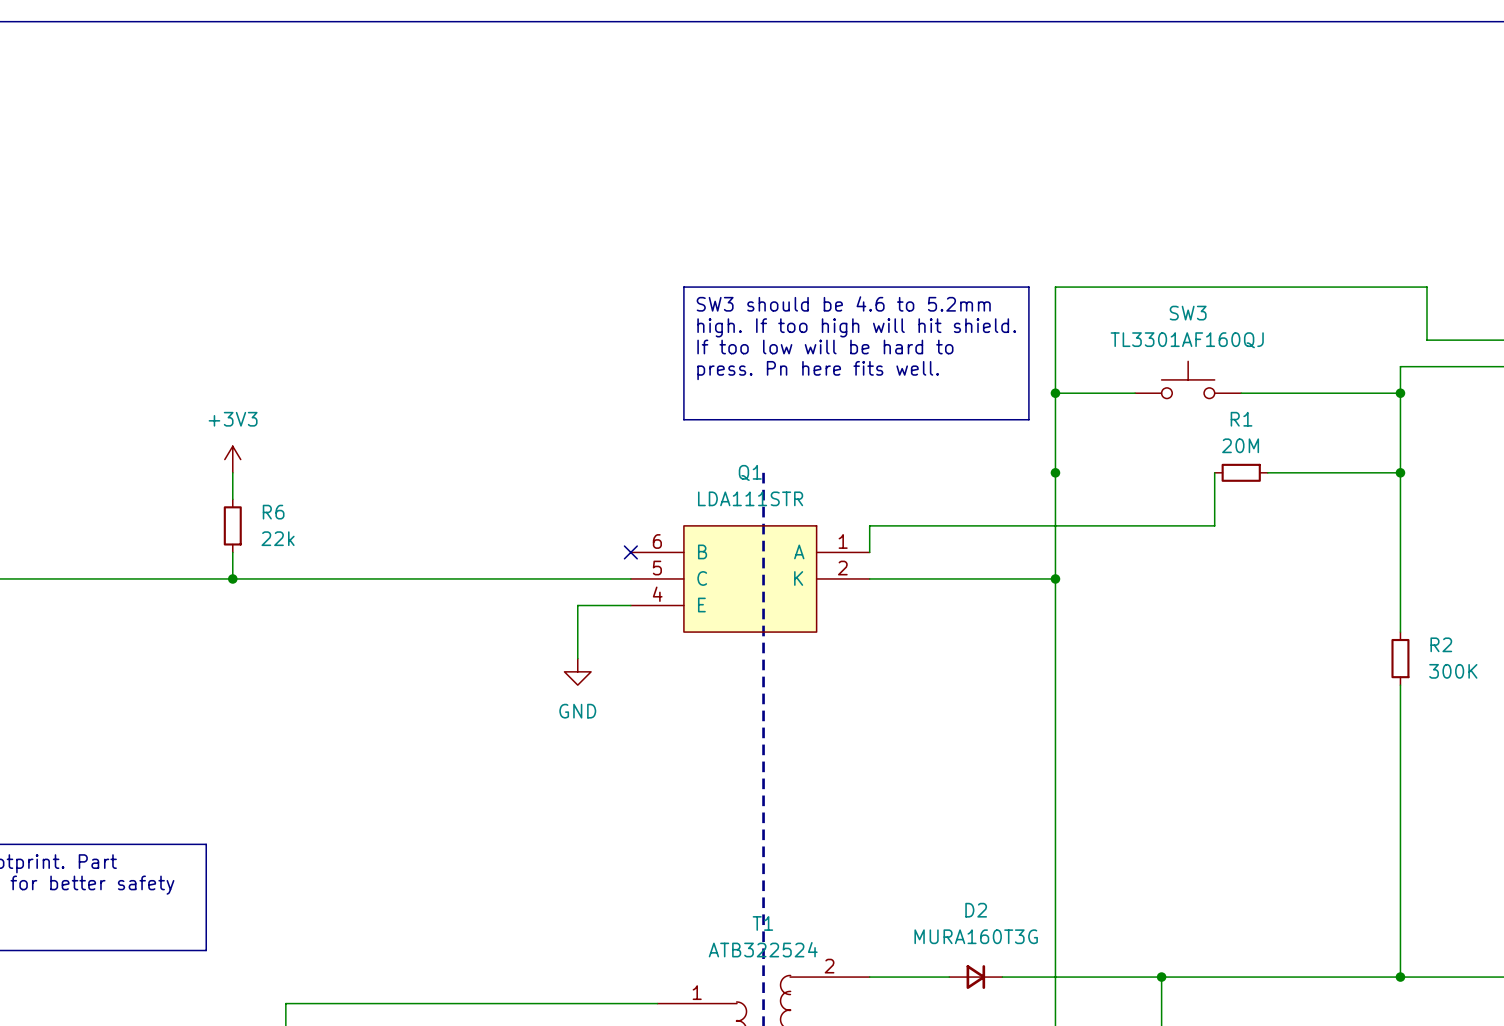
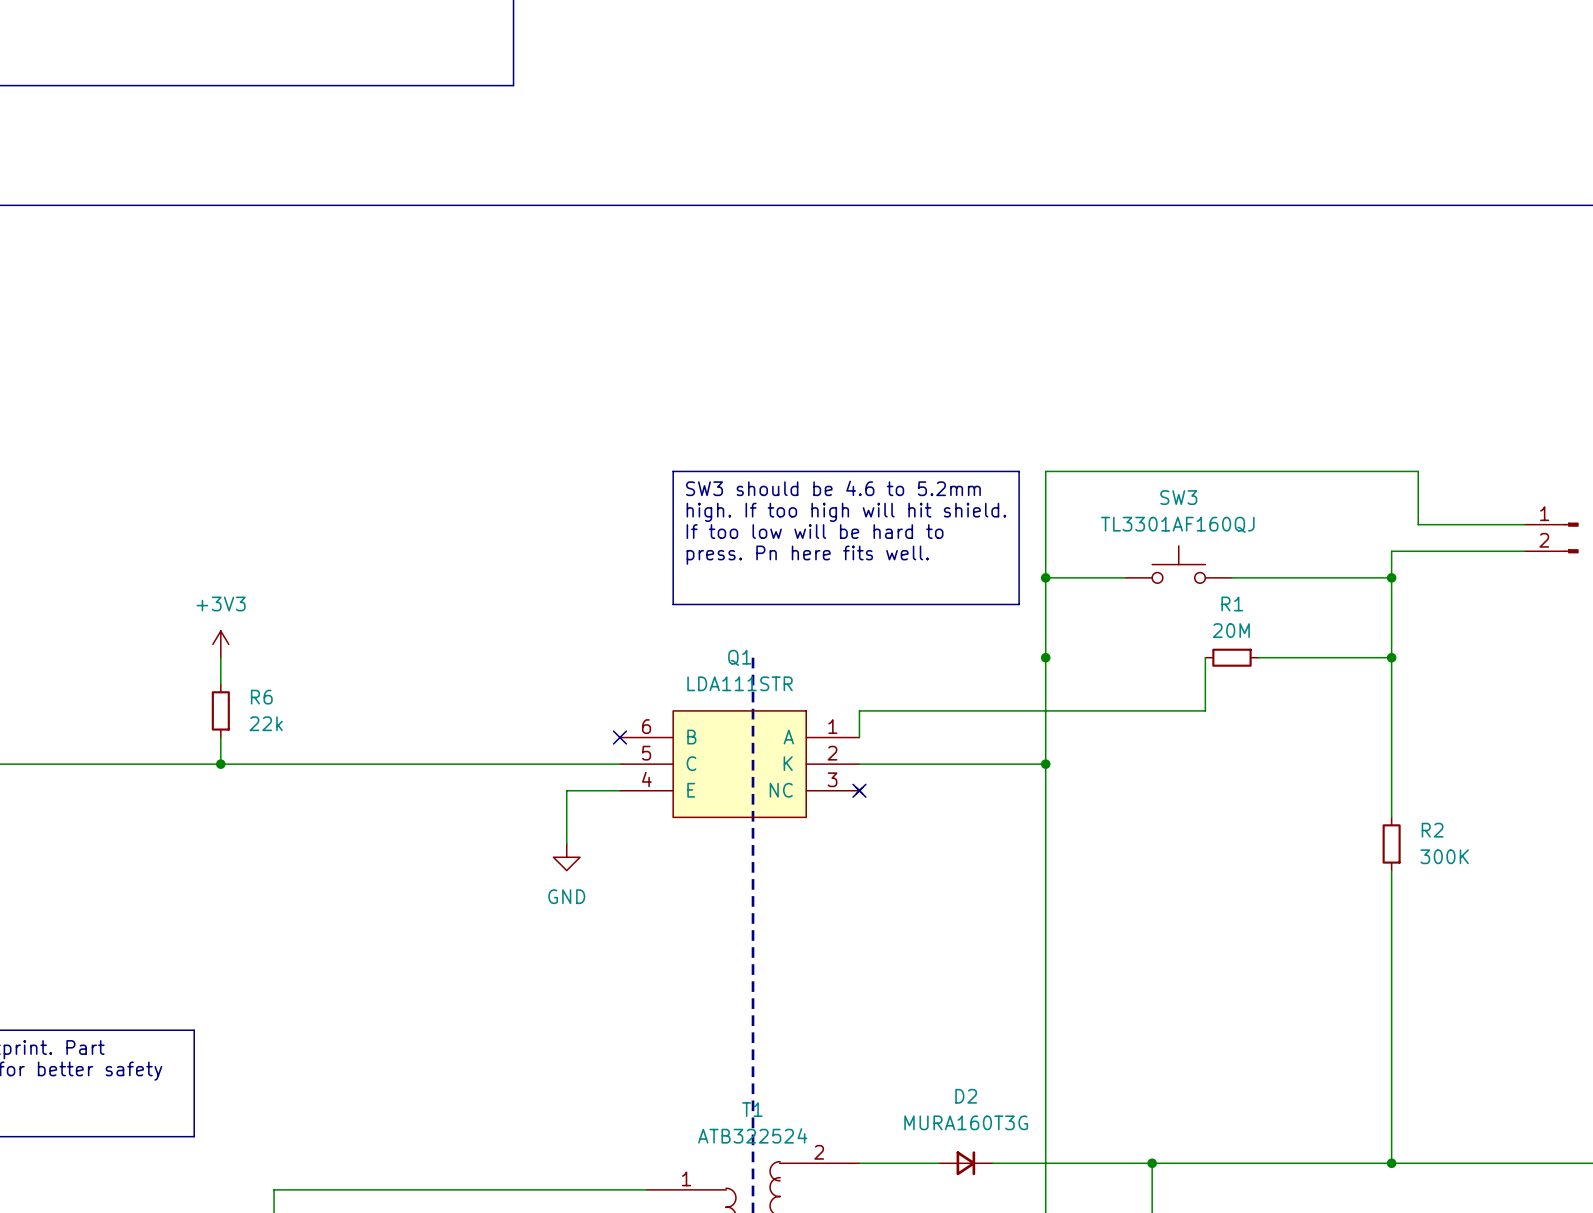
Q1 symbol: [630, 525, 870, 633] -> [619, 710, 863, 818]
no-connect mark: none -> (859, 790)

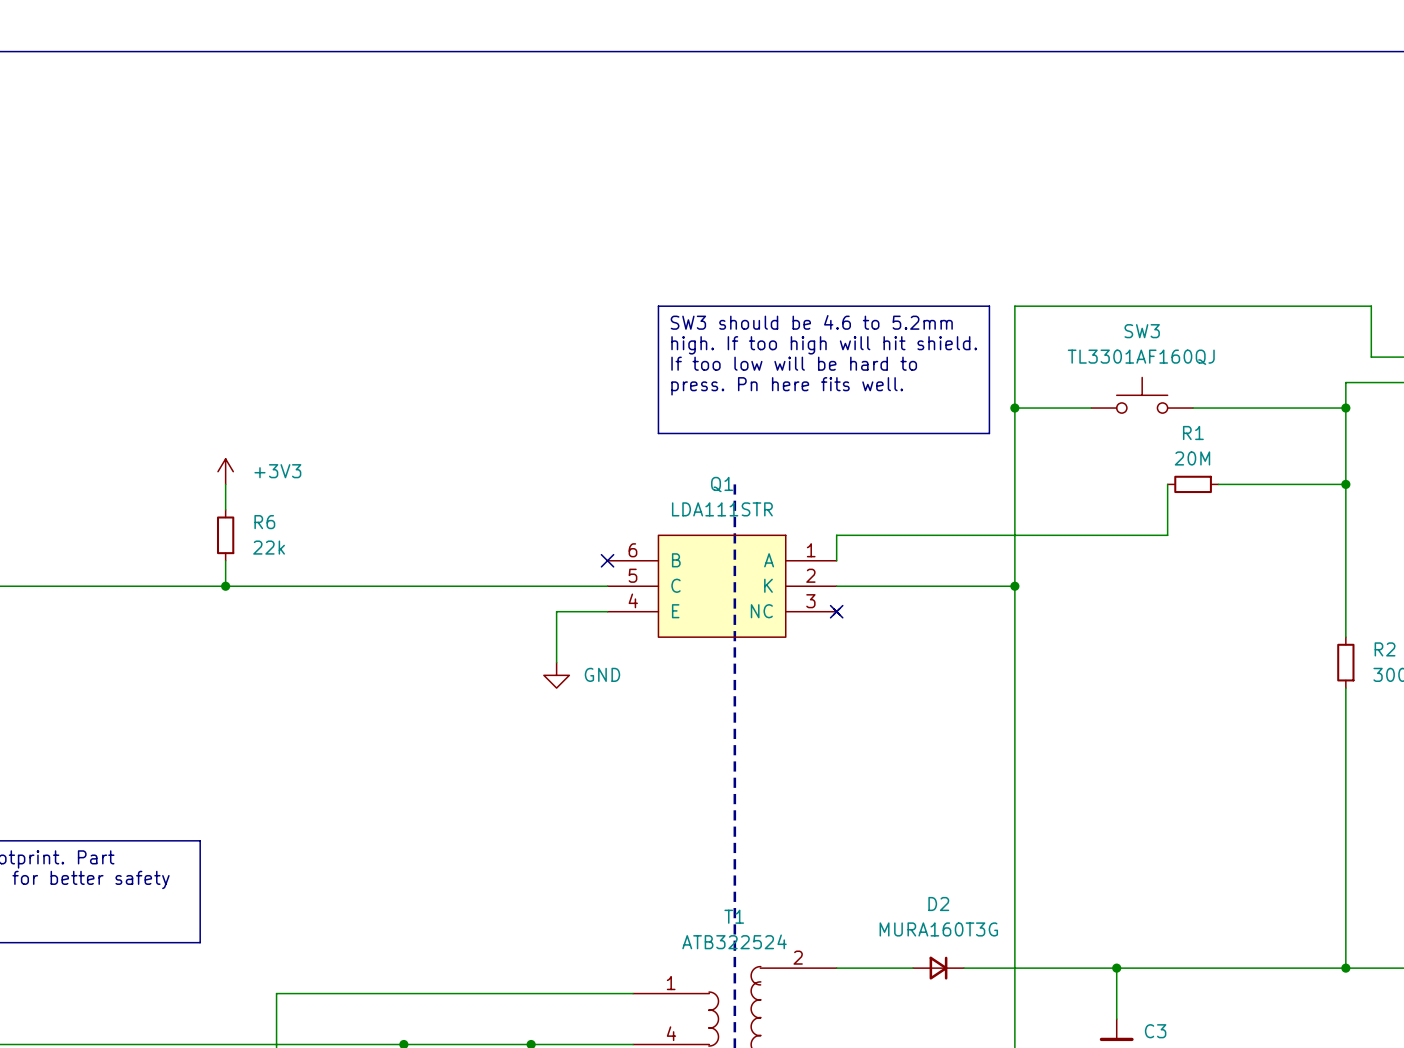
power symbol text position: +3V3 (221, 603) -> +3V3 (277, 471)
junction: (1045, 657) -> none
power symbol text position: GND (566, 896) -> GND (602, 674)

